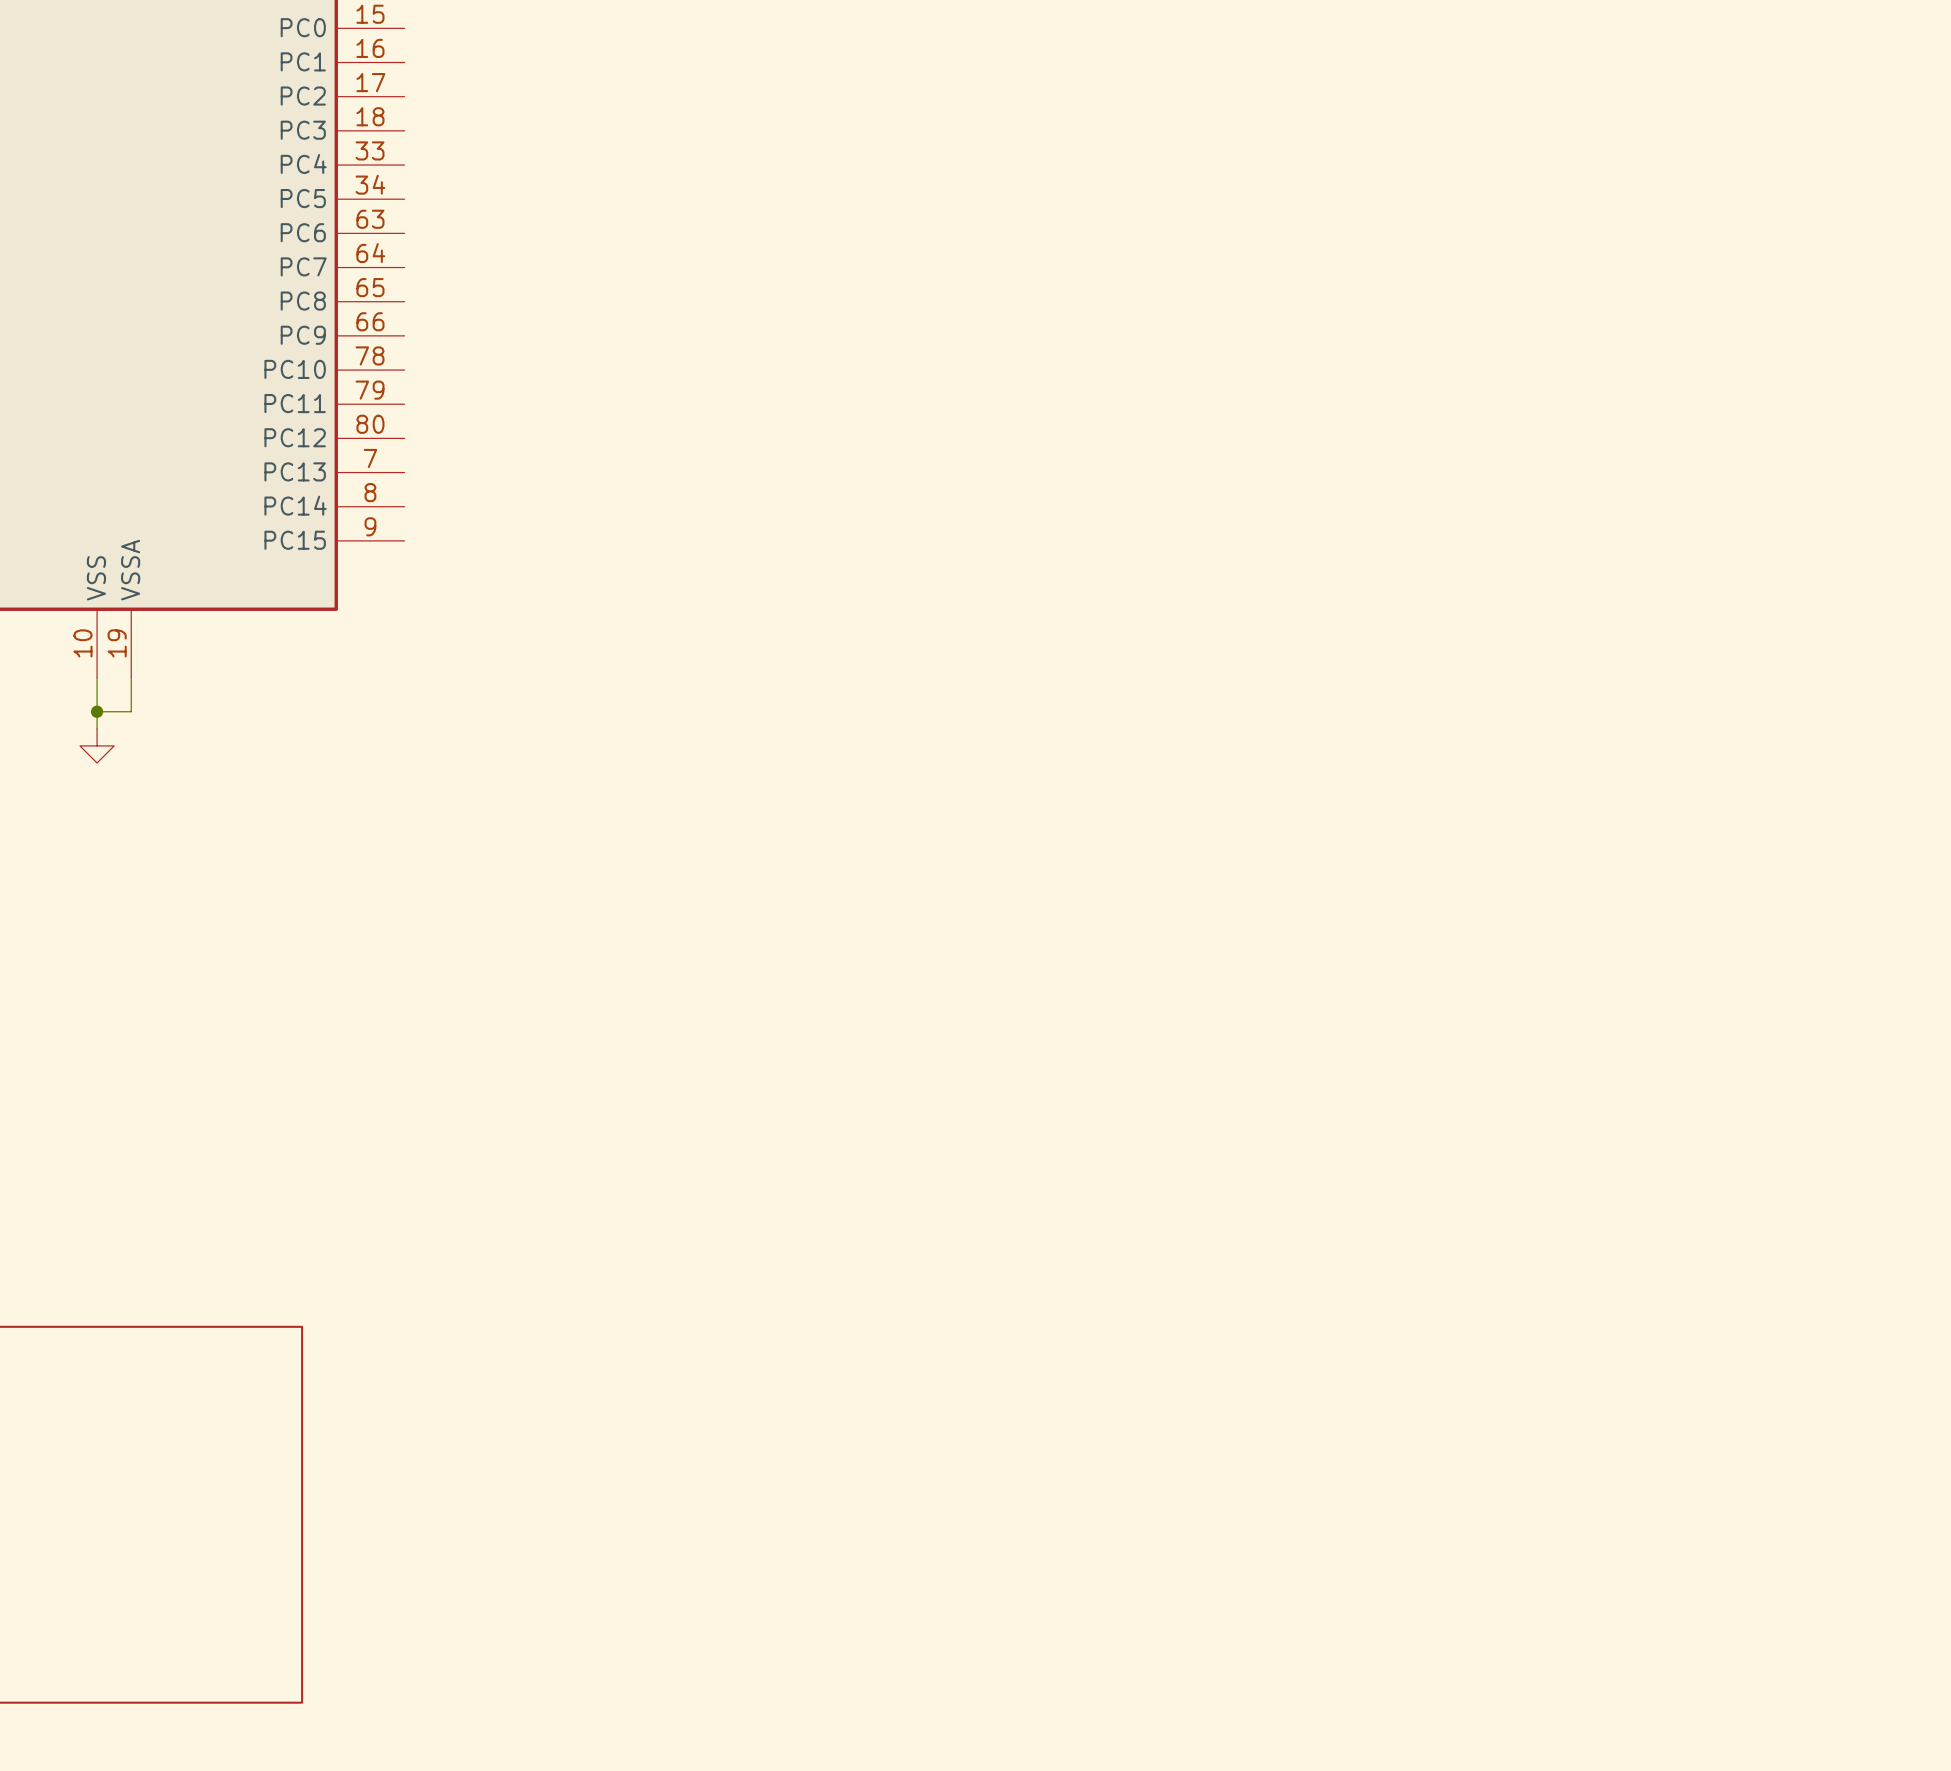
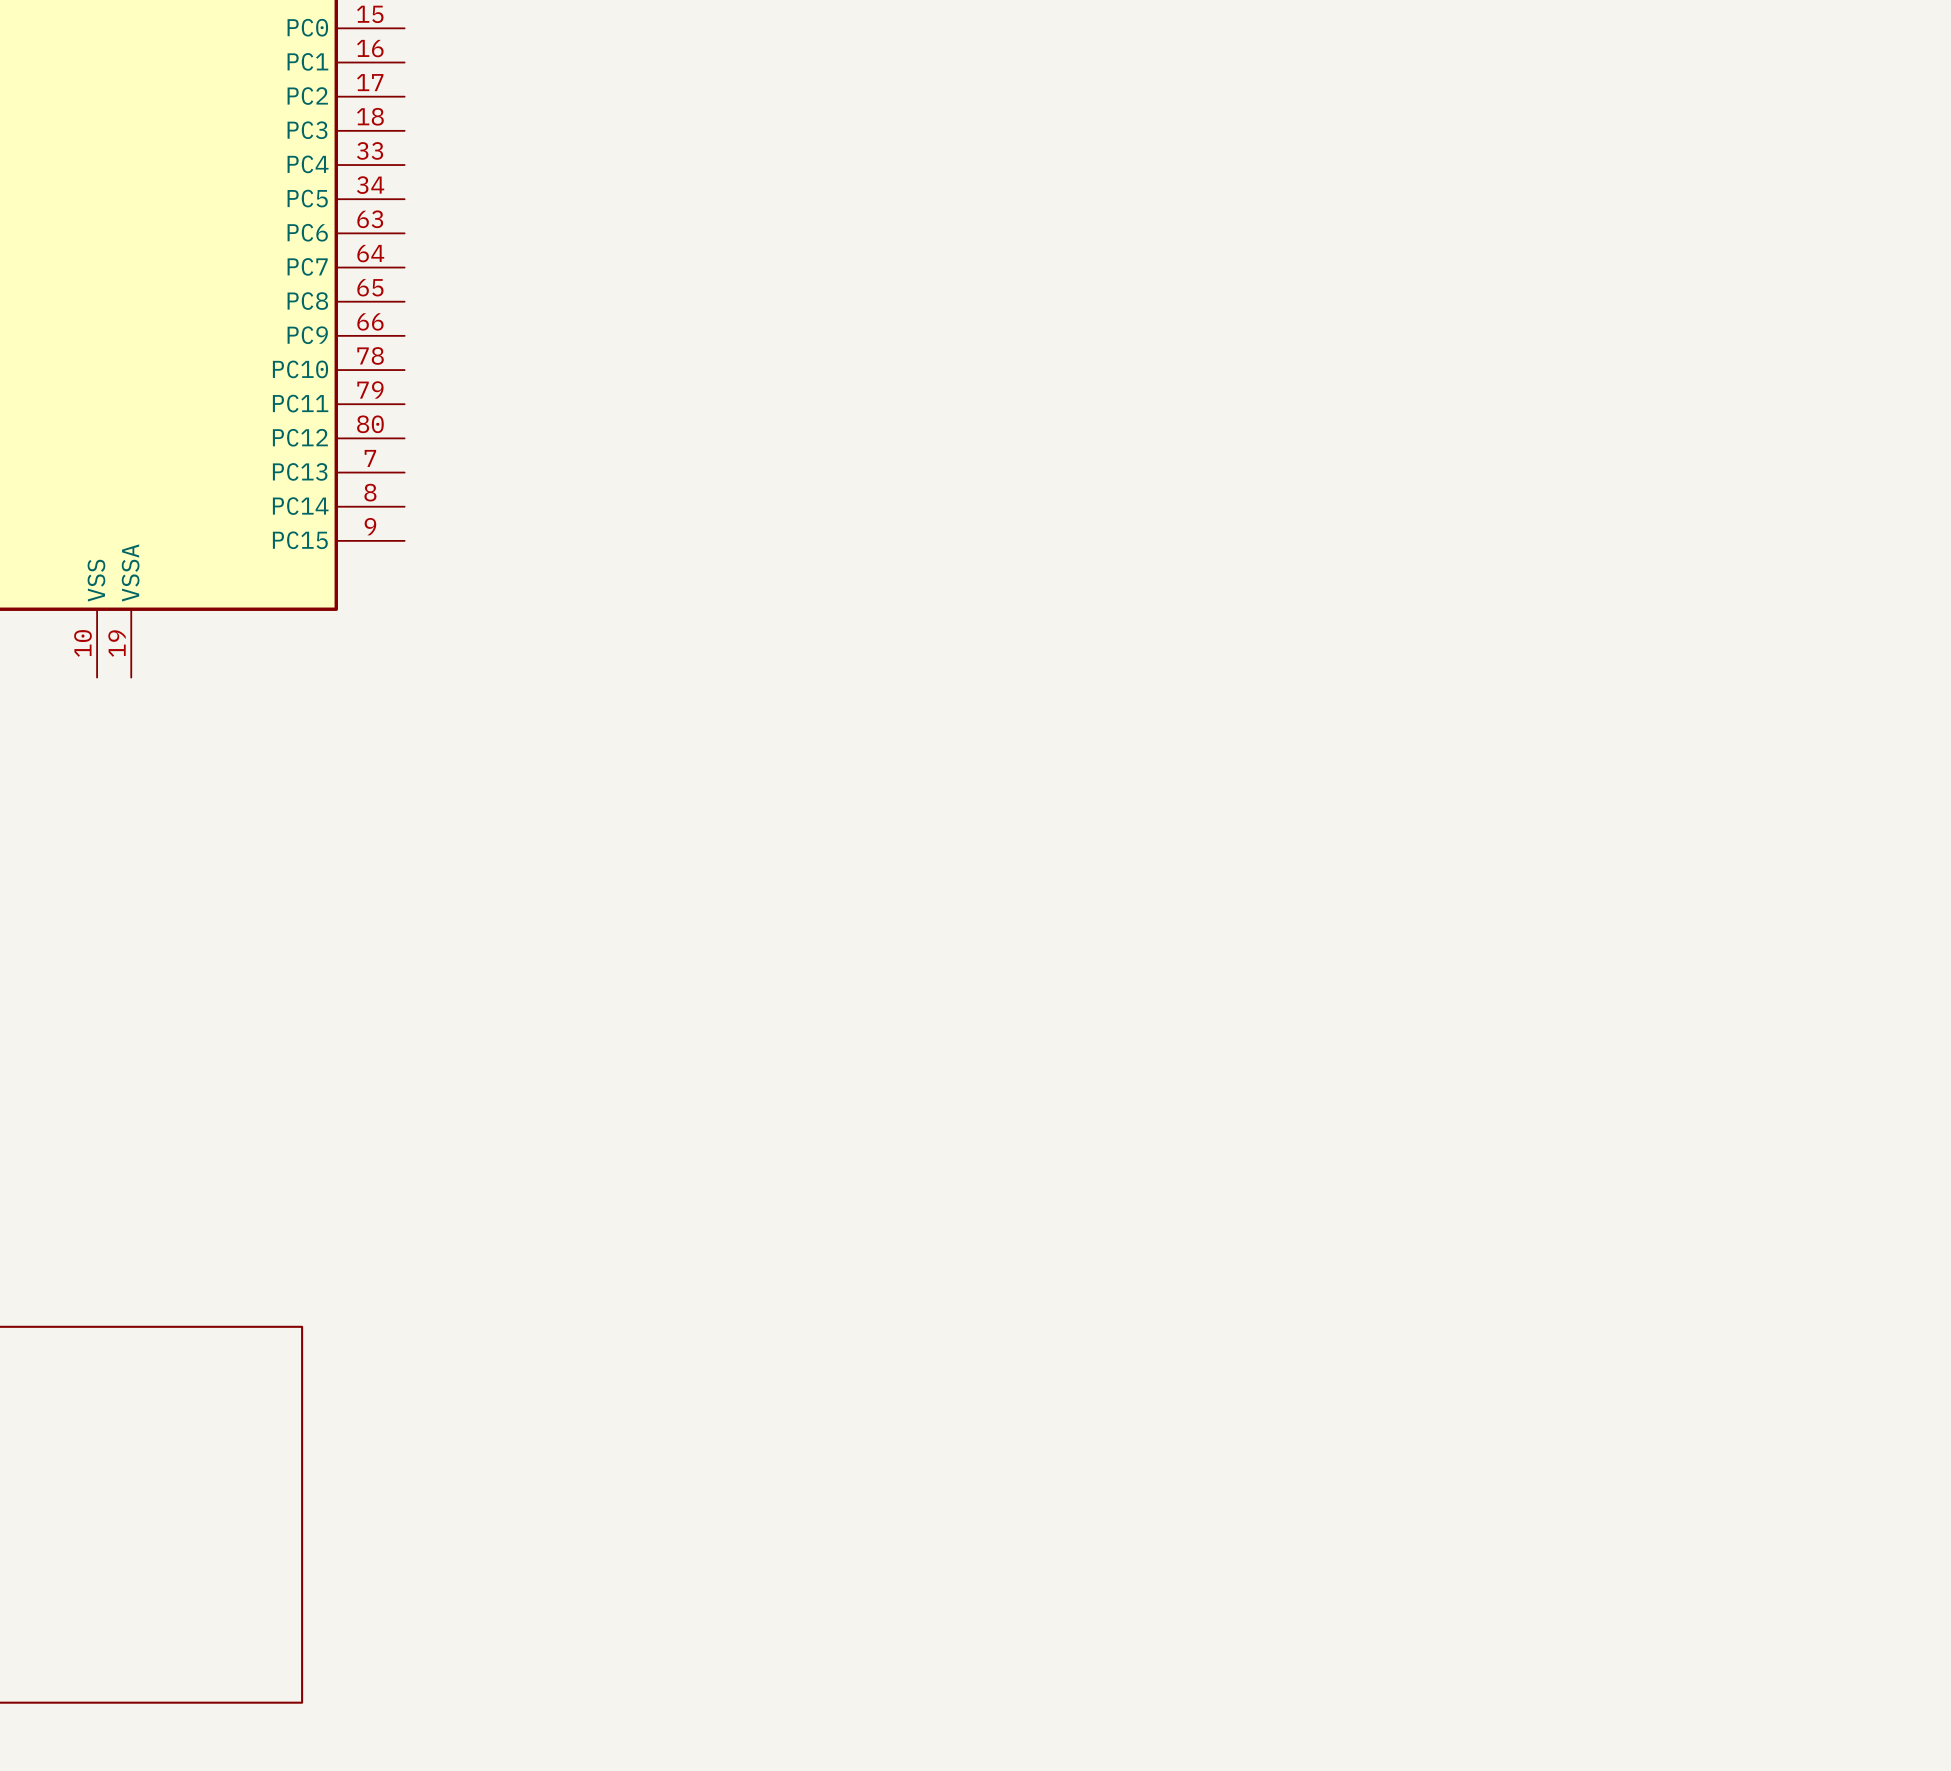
wire: (97, 677) (97, 728) -> none
wire: (131, 677) (131, 711) (97, 711) -> none
junction: (97, 711) -> none
power symbol: (97, 745) -> none

